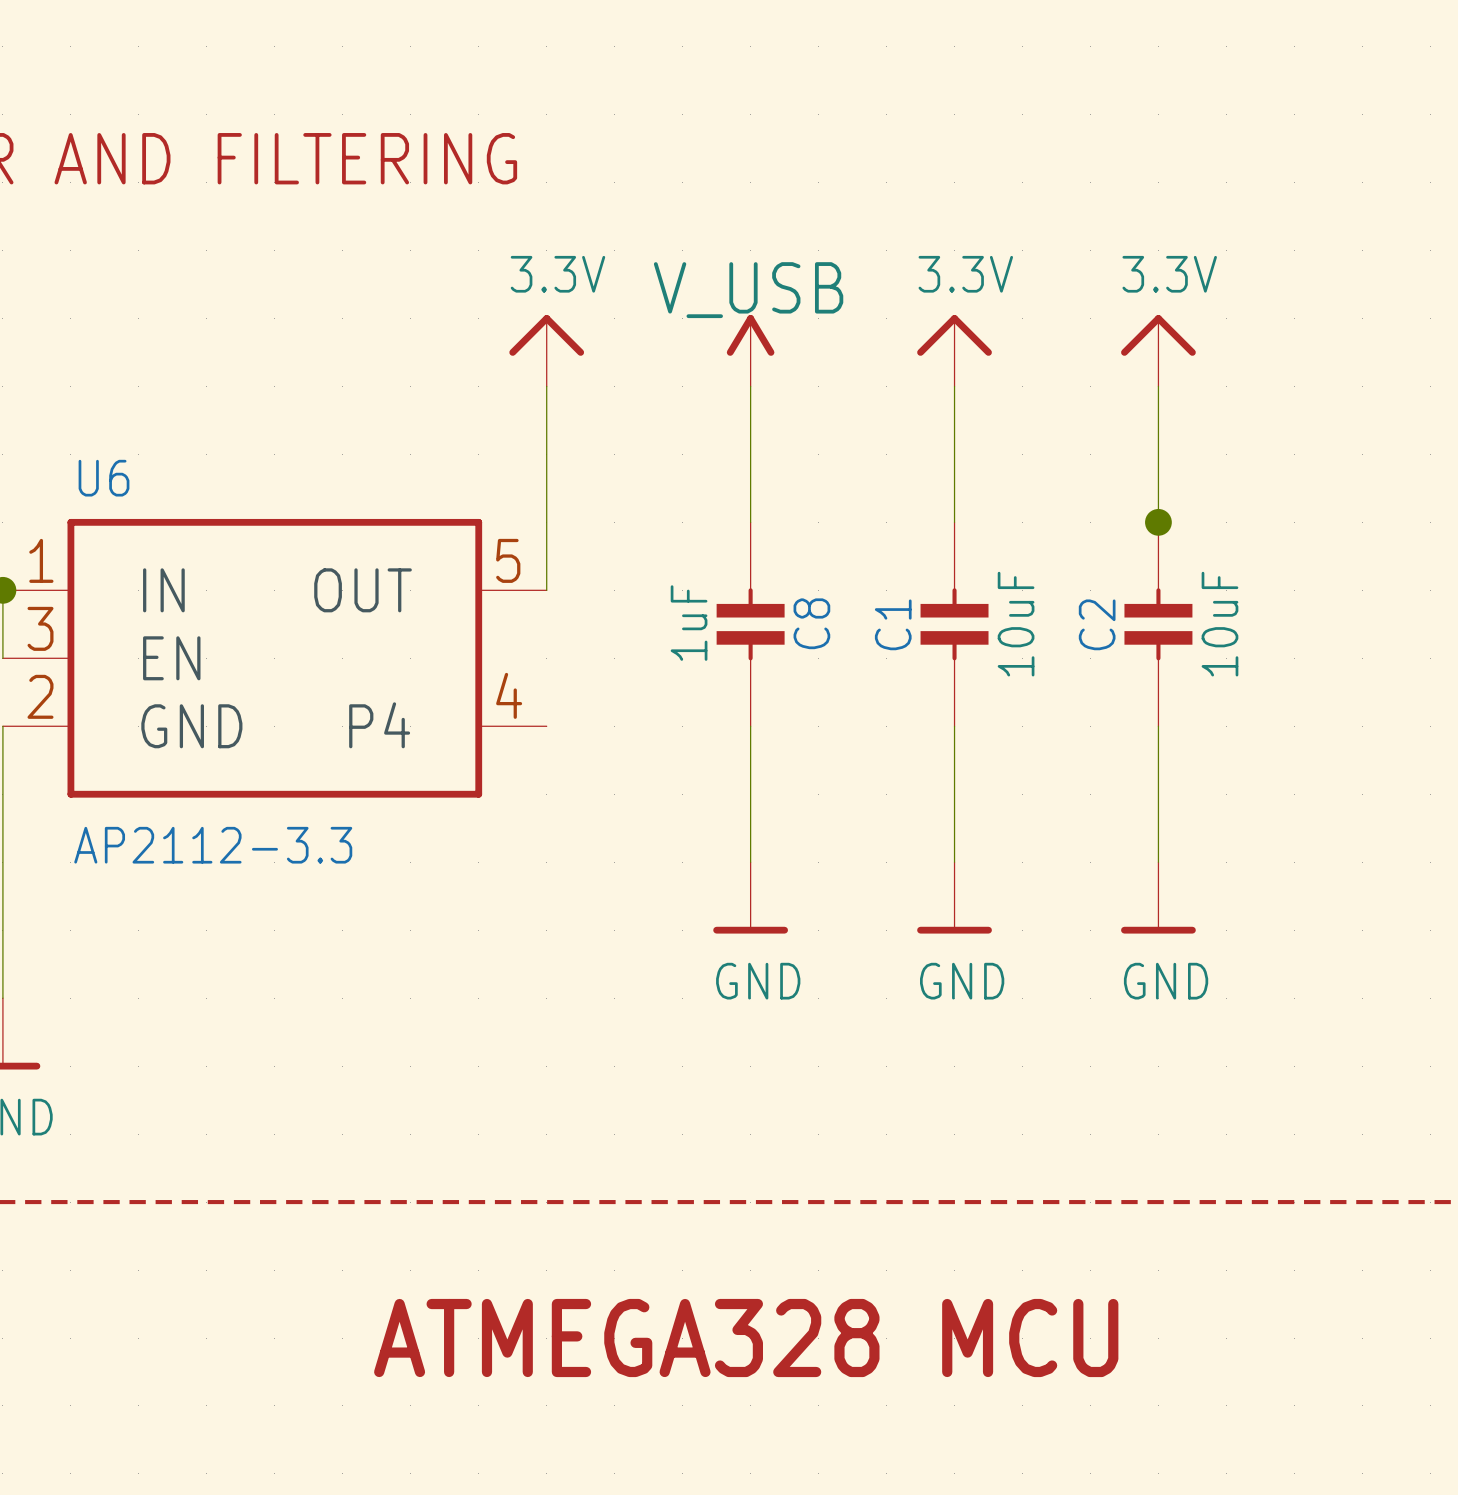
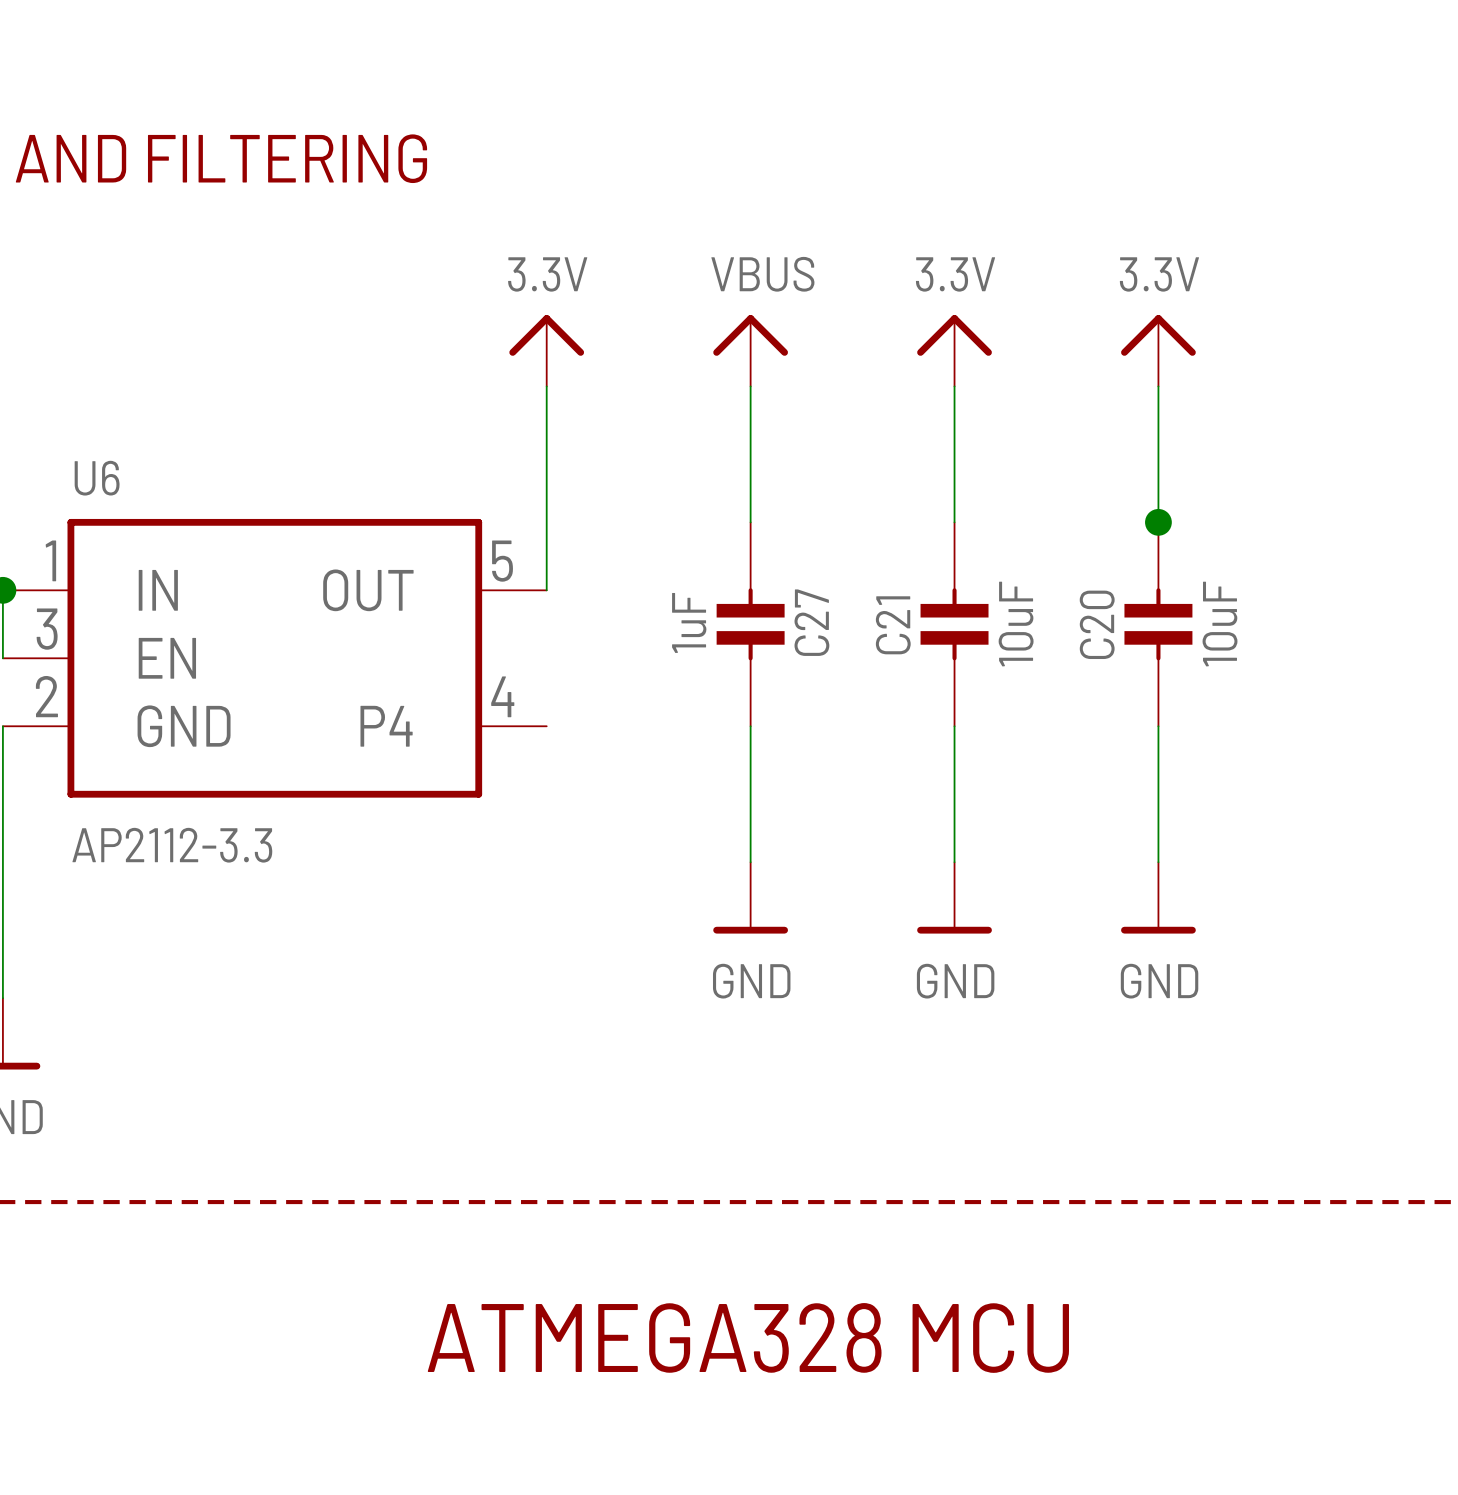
power symbol: V_USB (750, 350) -> VBUS (750, 350)
C8 name: C8 (811, 623) -> C27 (811, 622)
C1 name: C1 (893, 624) -> C21 (893, 625)
C2 name: C2 (1097, 624) -> C20 (1097, 624)

